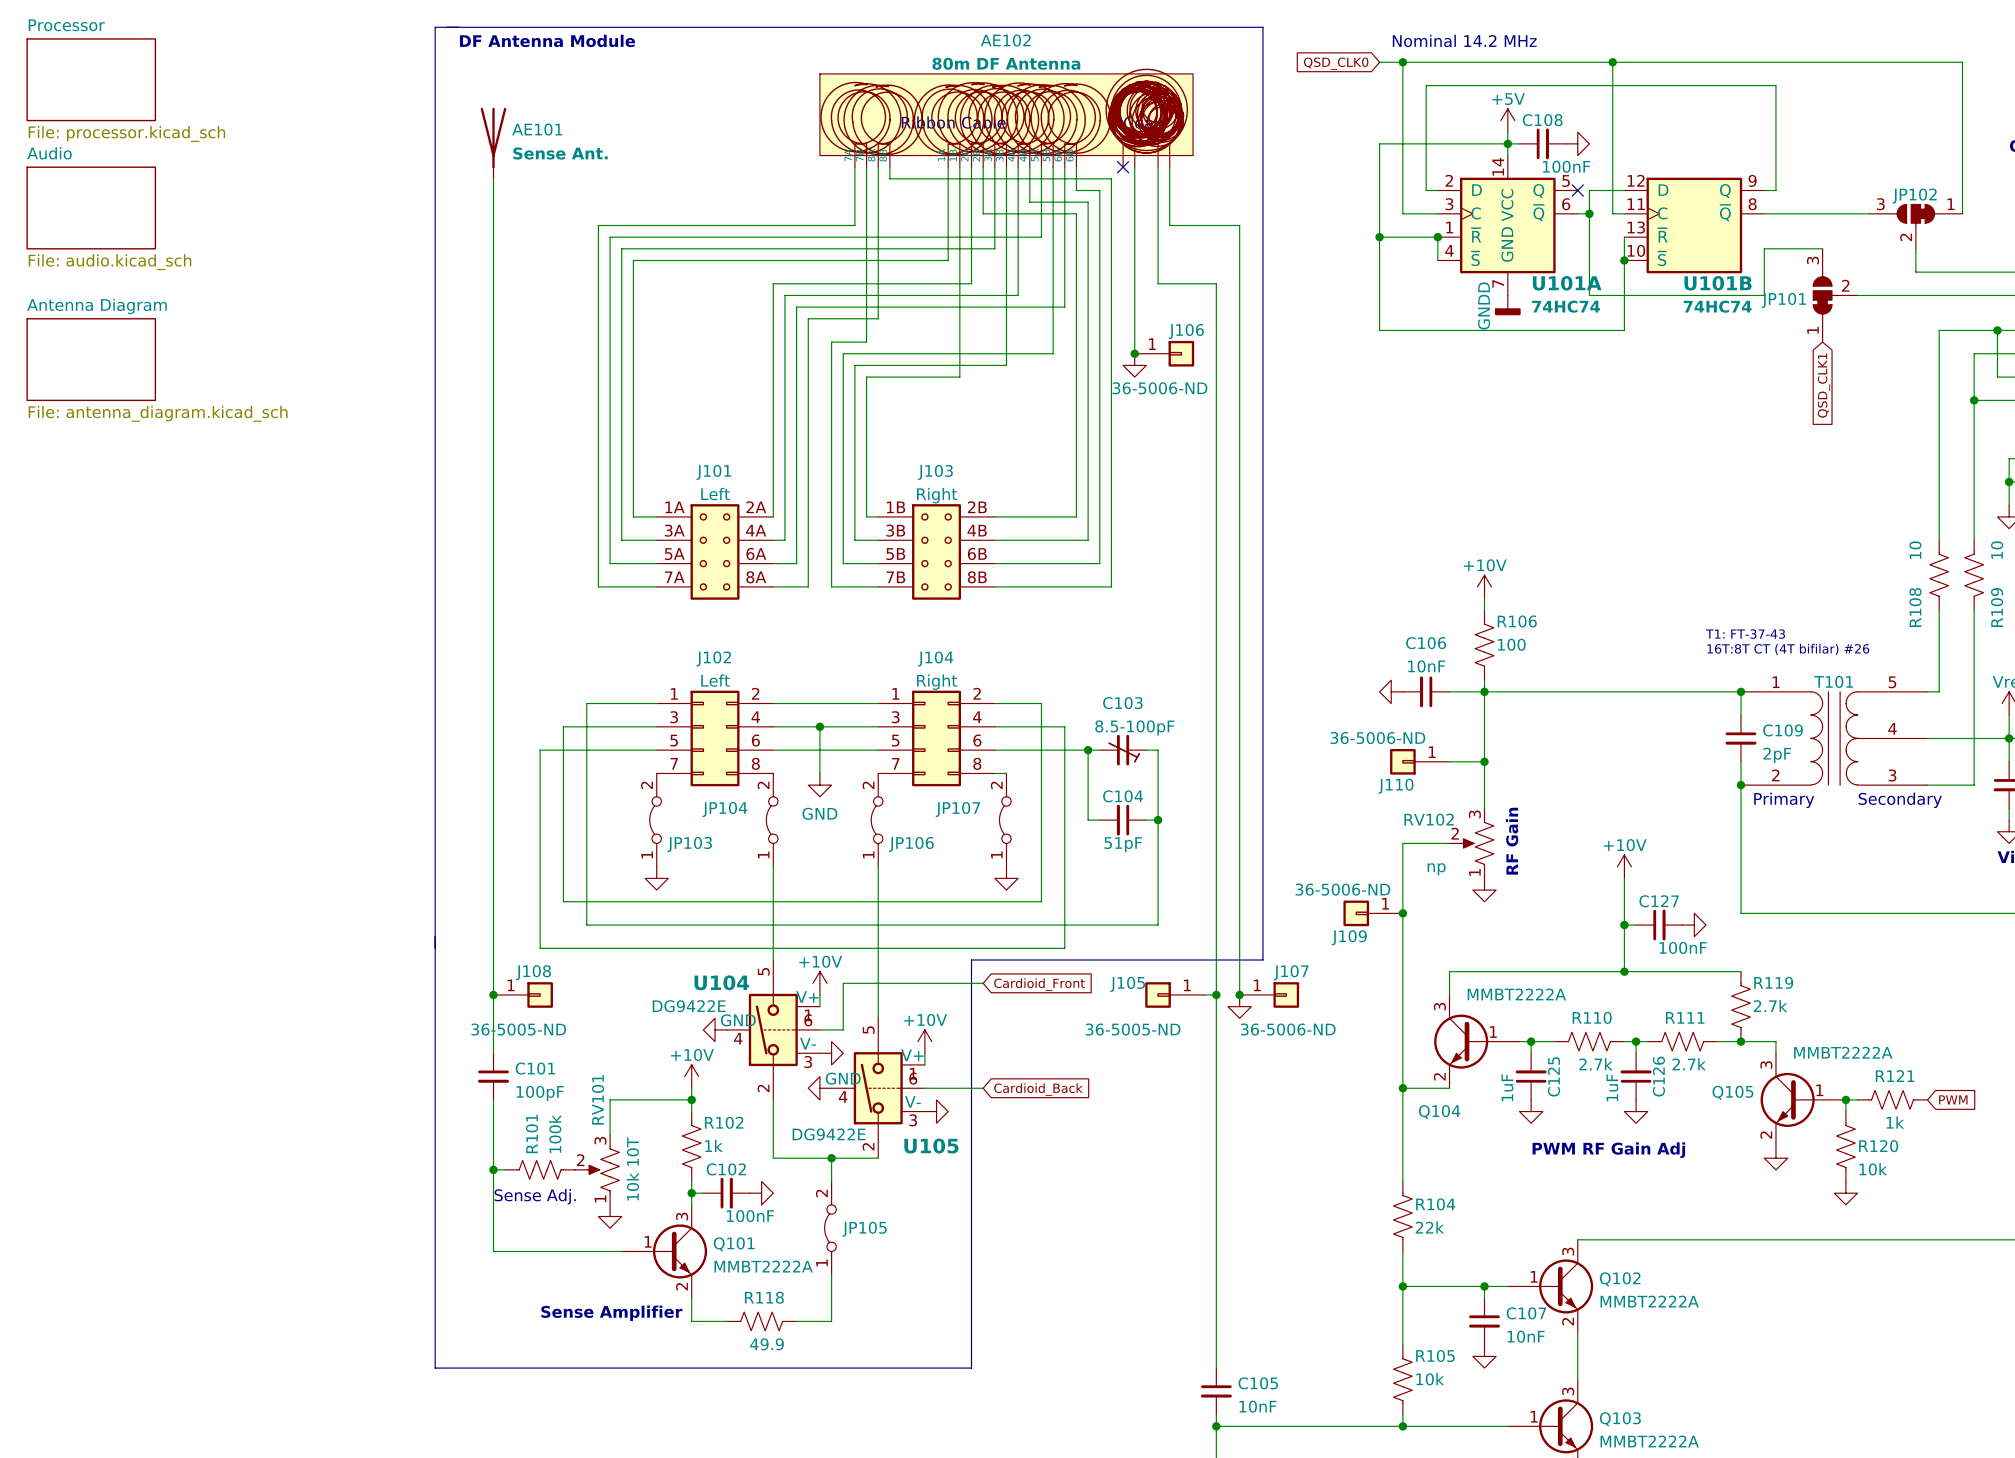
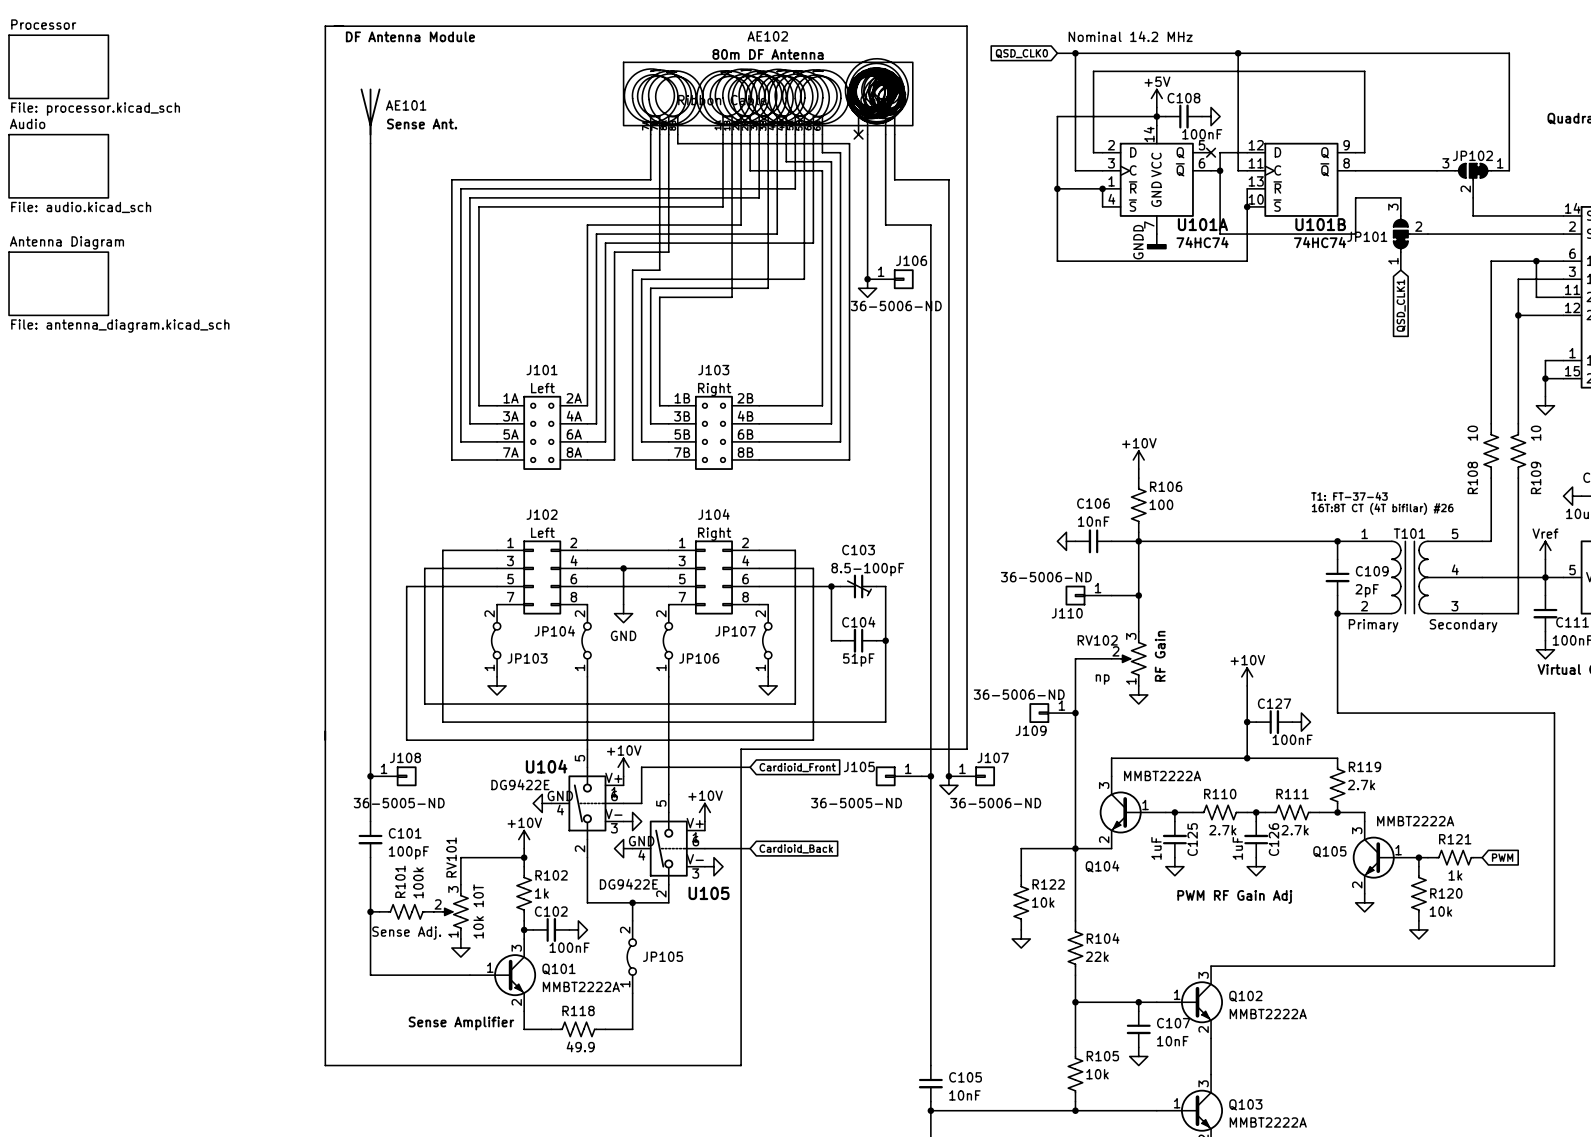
wire: none -> (1075, 848) (1021, 848) (1021, 875)
R122: none -> 10k (1021, 902)
power symbol: none -> (1021, 939)

